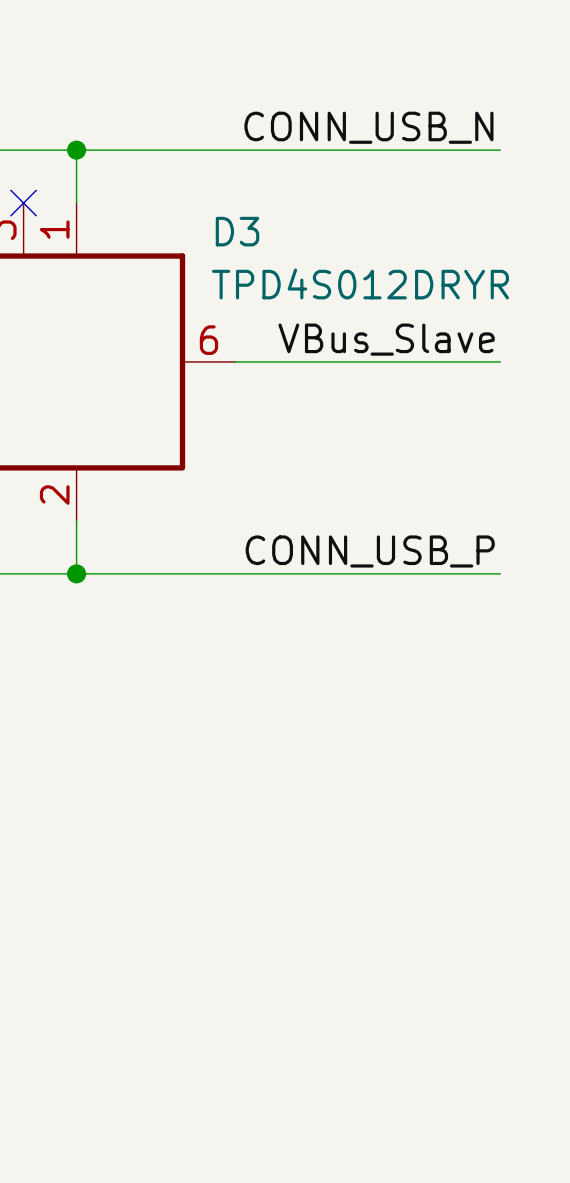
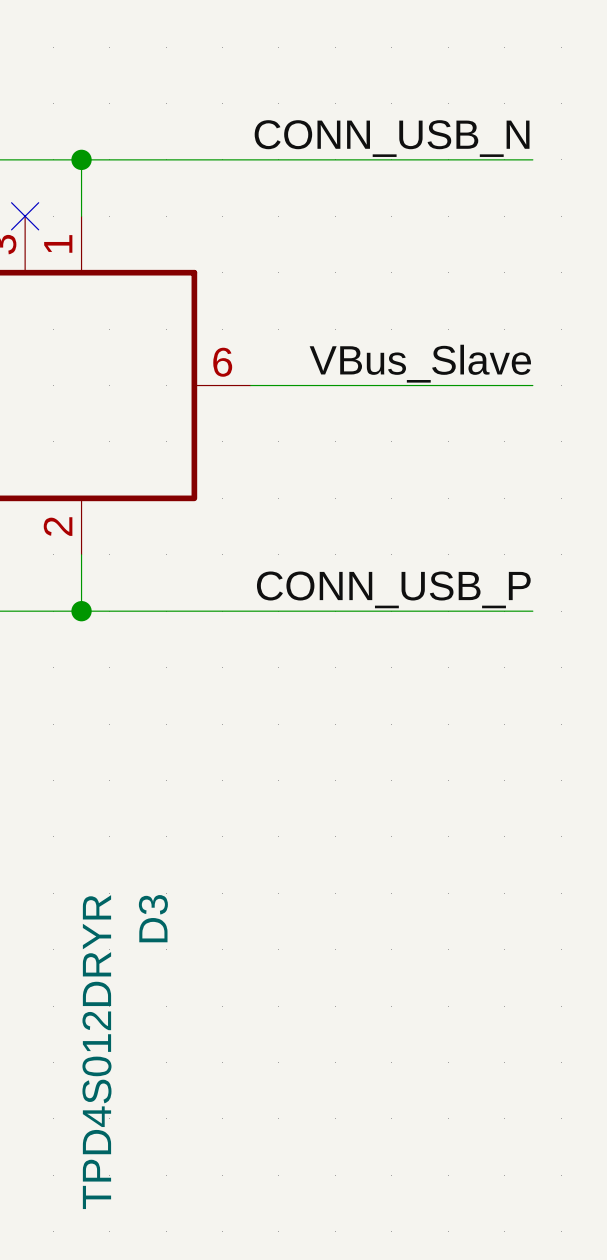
D3 name rotation: 0° (237, 231) -> 90° counterclockwise (153, 918)
D3 name position: D3 (237, 231) -> D3 (153, 918)
D3 value rotation: 0° (360, 283) -> 90° counterclockwise (96, 1052)
D3 value position: TPD4S012DRYR (360, 283) -> TPD4S012DRYR (96, 1052)

